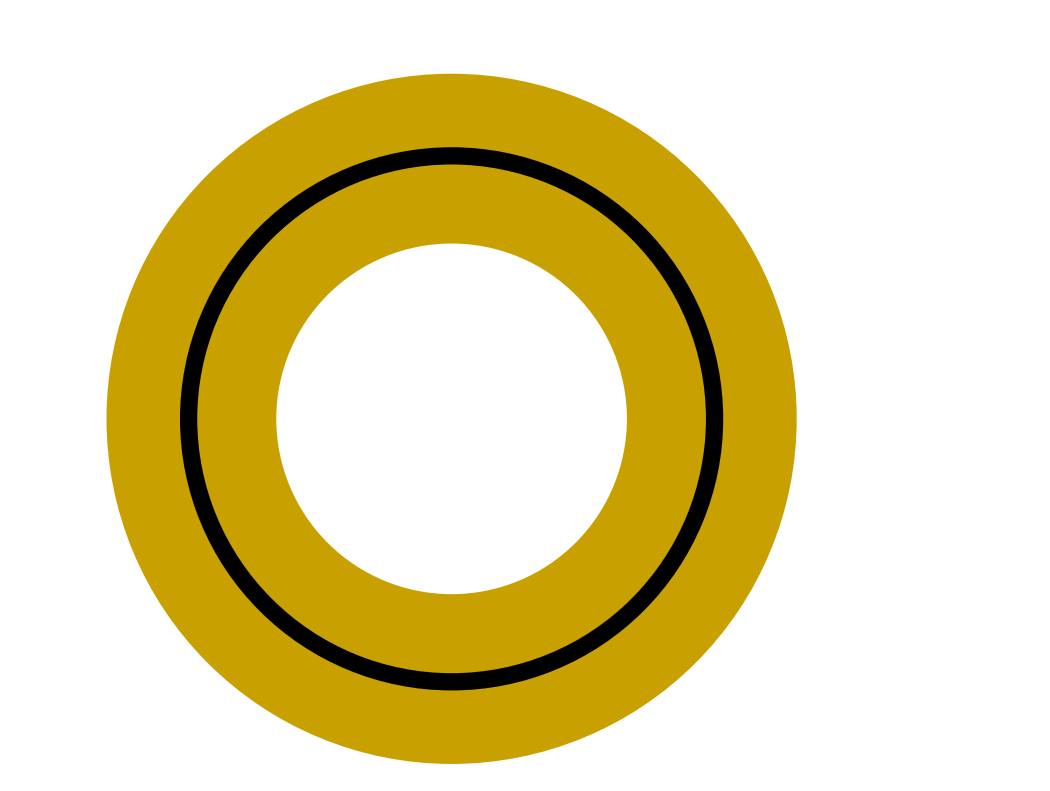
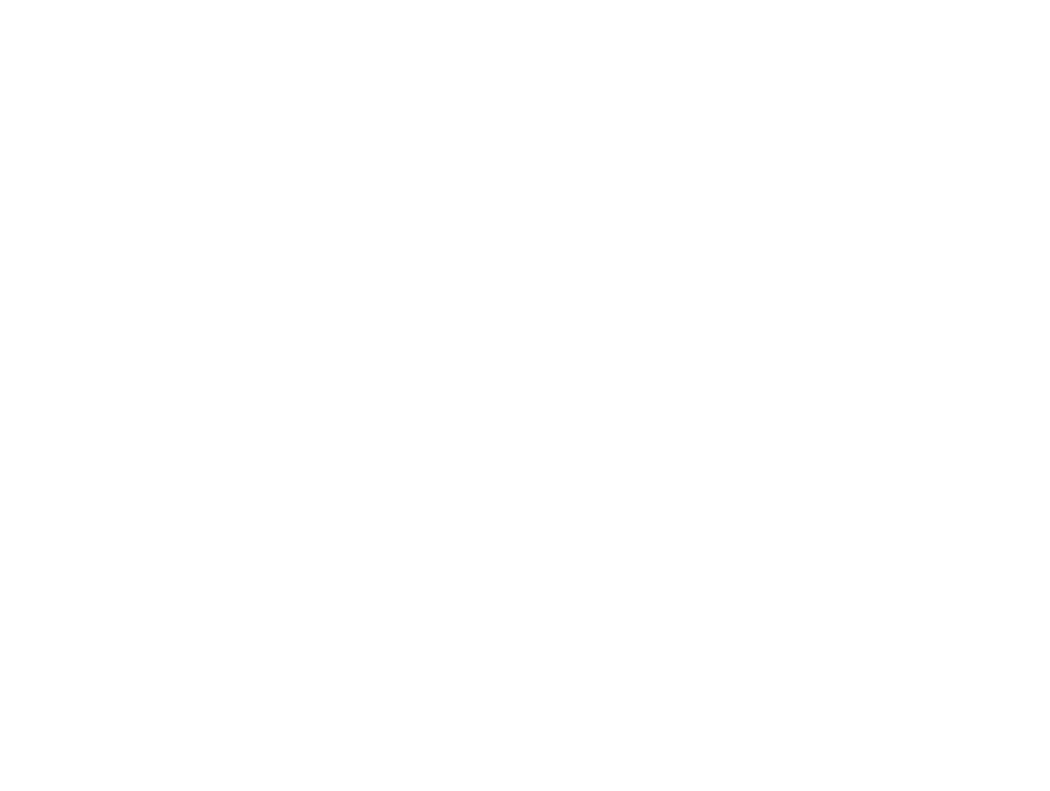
part: (451, 418) -> none

